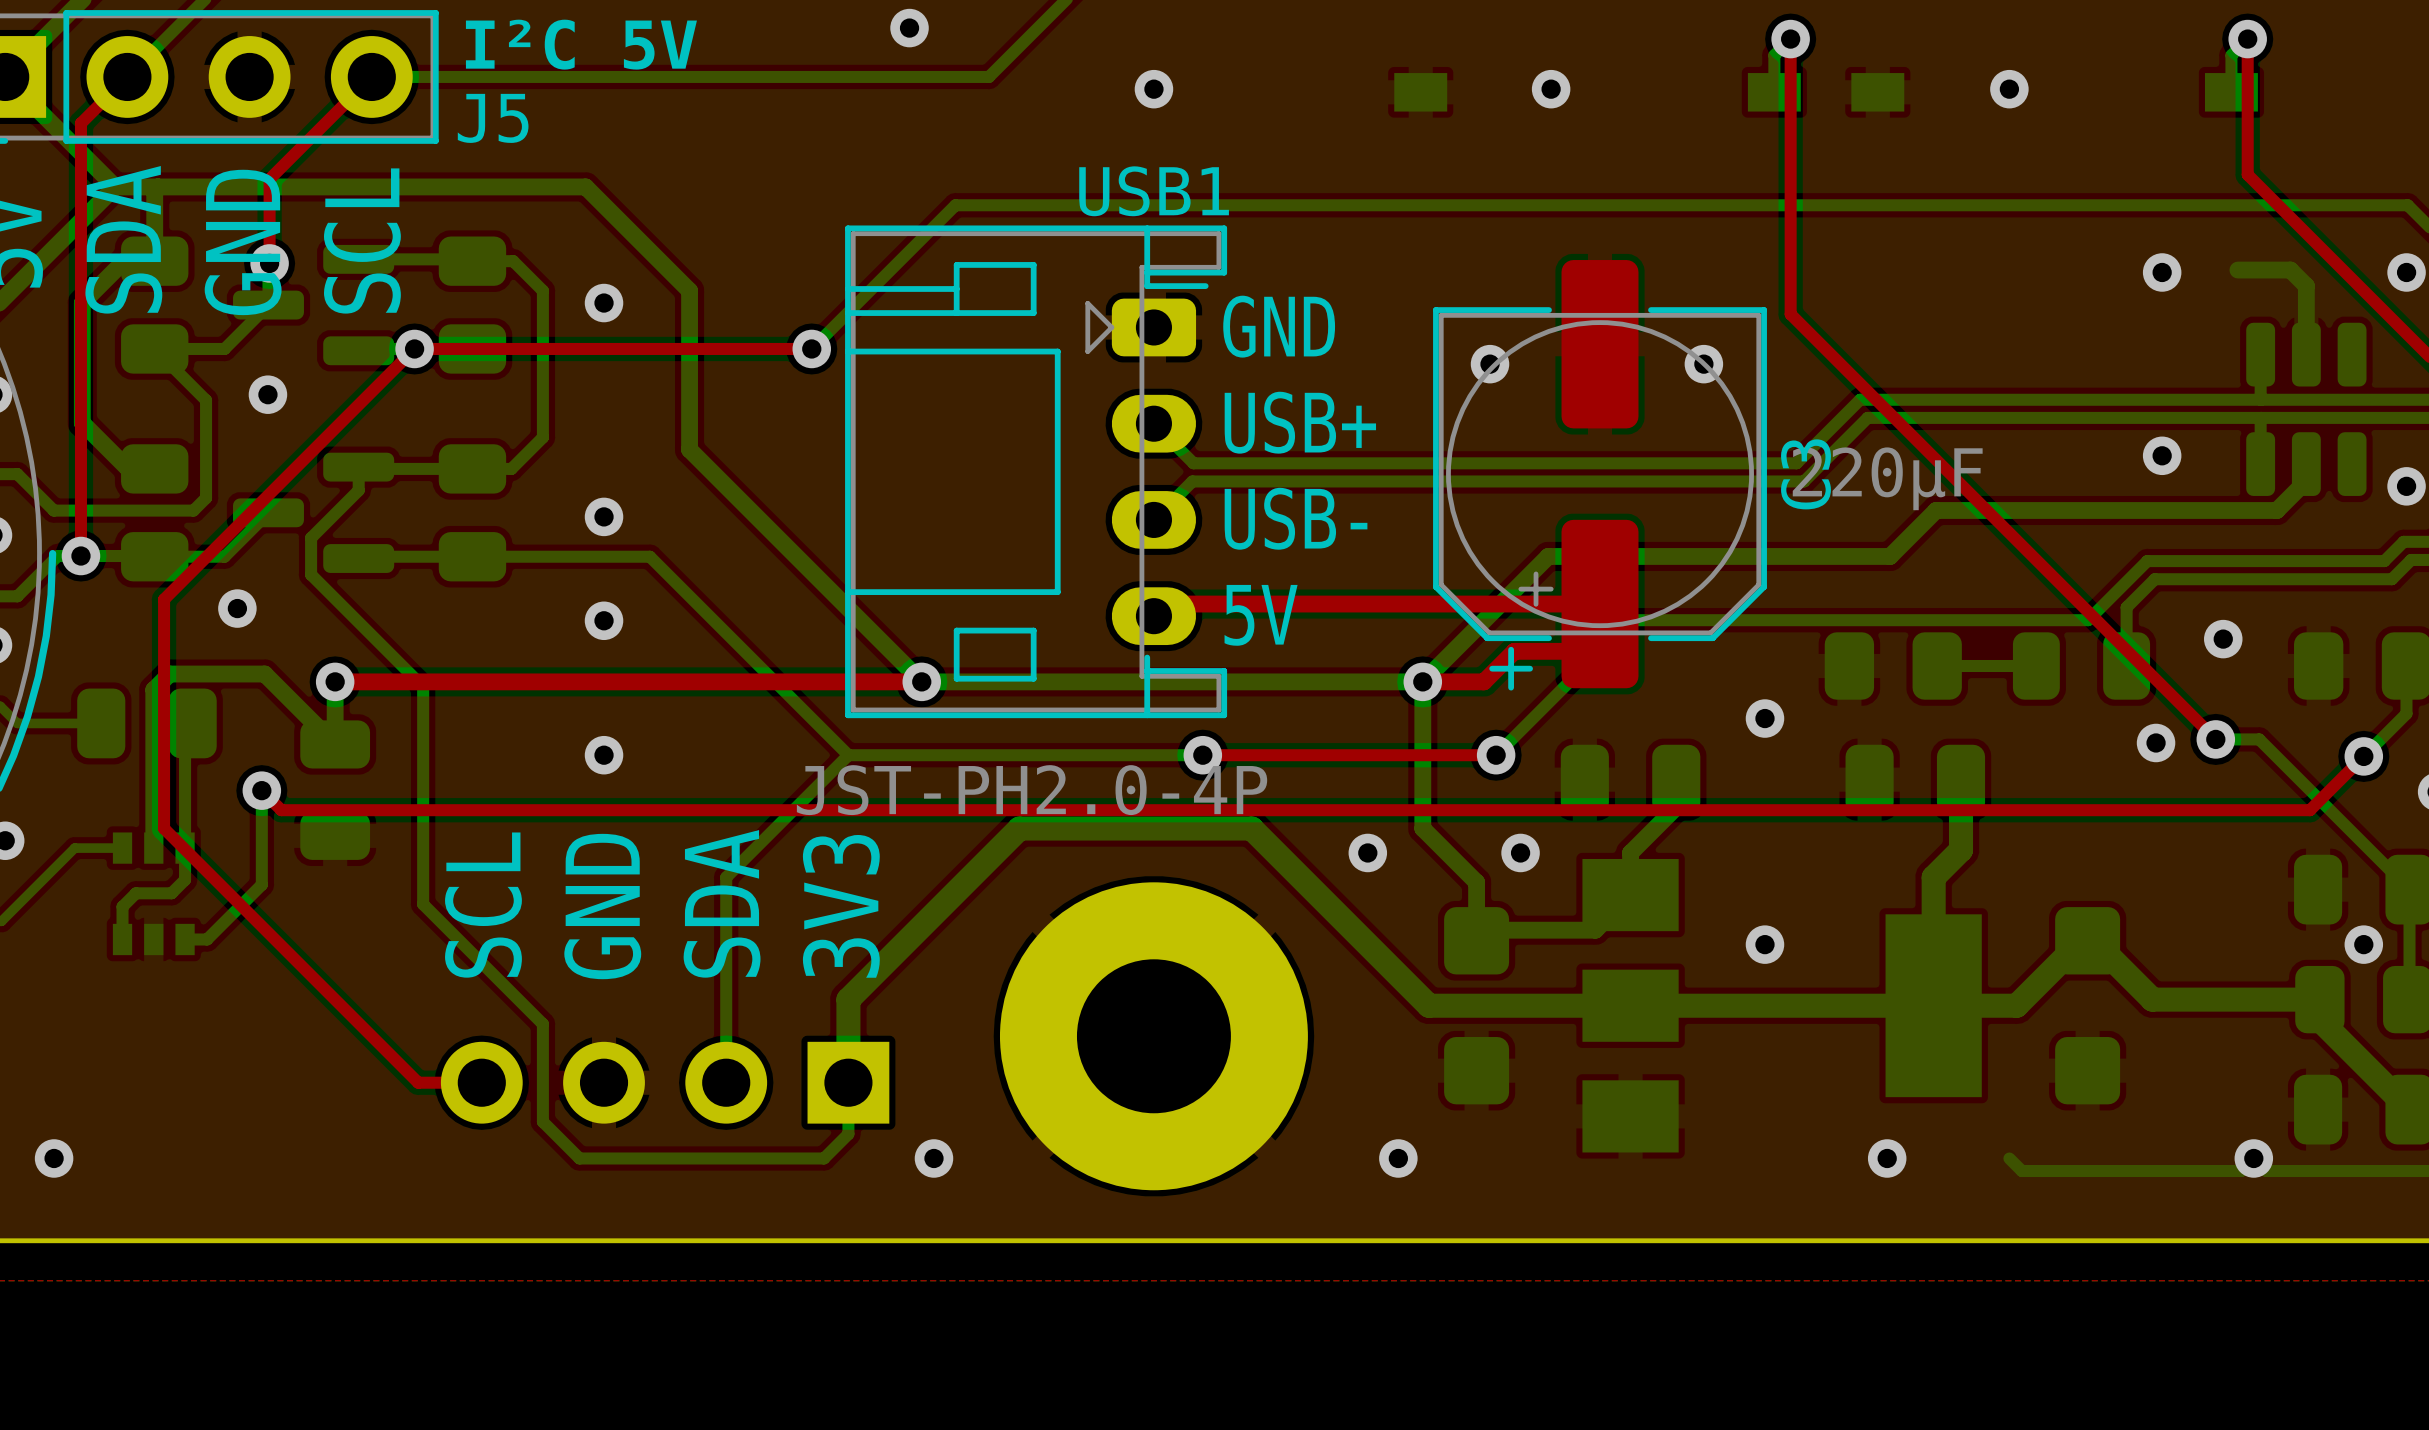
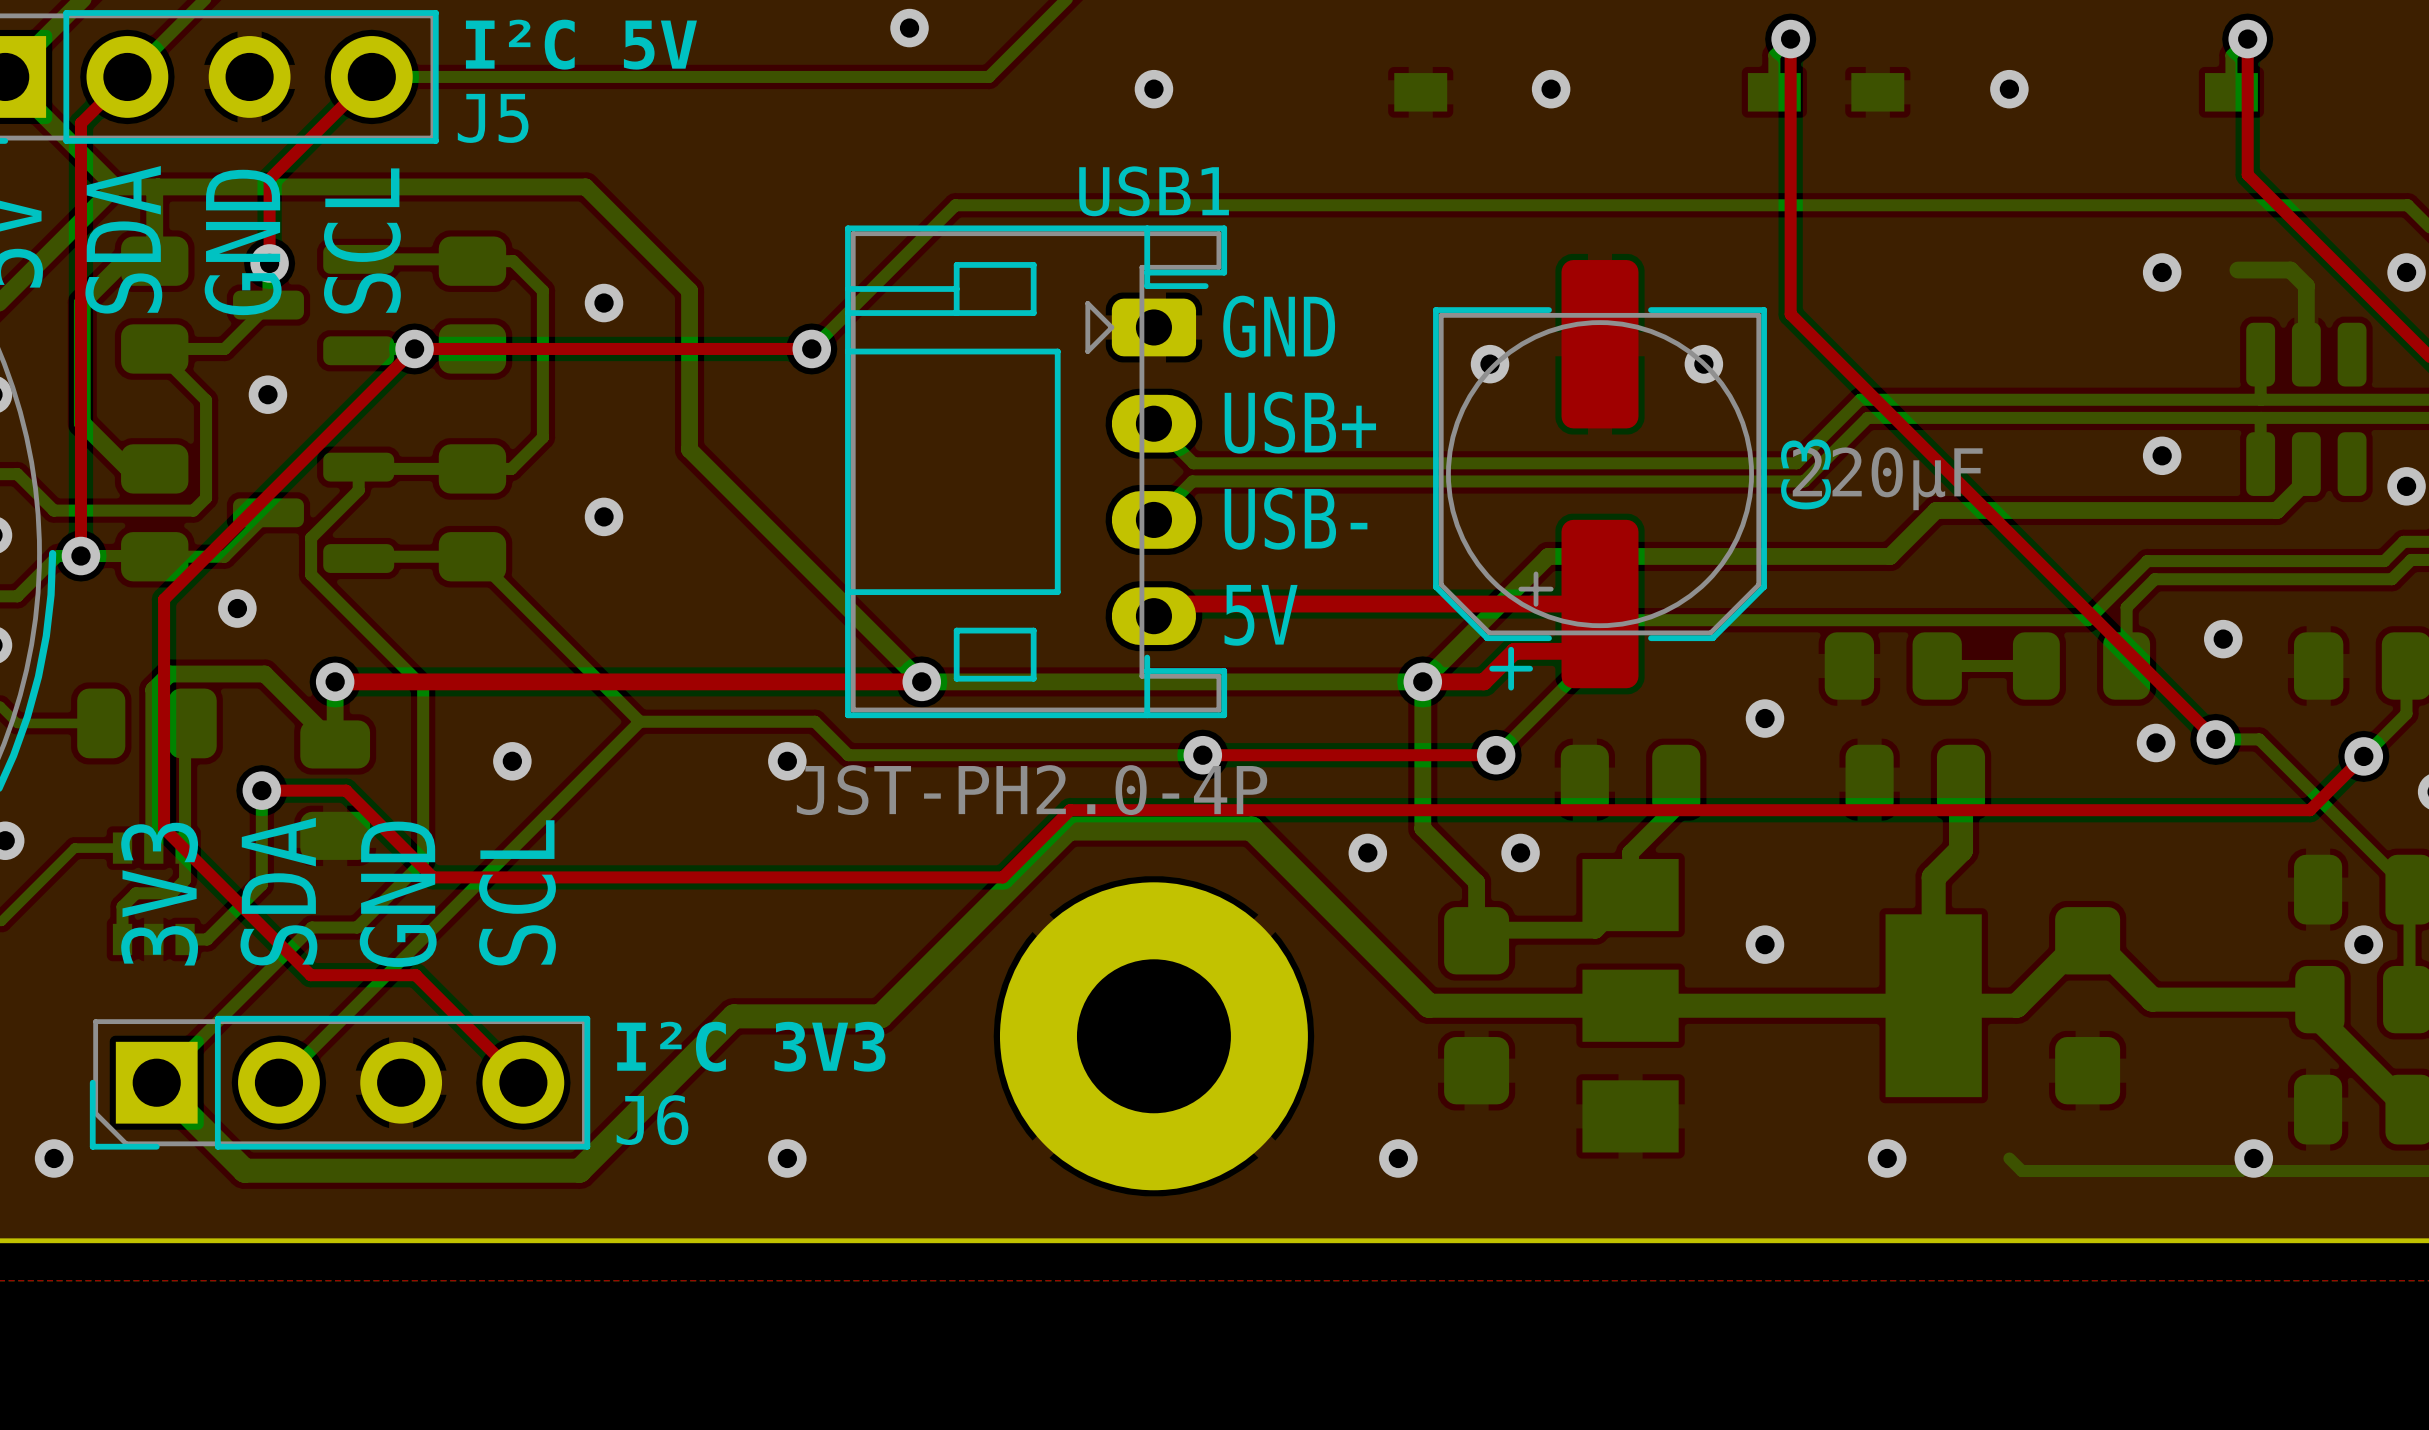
bottom track: (474, 556) (649, 556) (814, 721) -> (474, 556) (639, 721)
via: (604, 620) -> none
bottom track: none -> (639, 721) (278, 1082)
bottom track: none -> (639, 721) (814, 721)
via: (604, 755) -> none
bottom track: (848, 755) (726, 877) (726, 1082) -> none
via: none -> (512, 761)
via: none -> (787, 761)
top track: (261, 790) (281, 810) (1070, 810) -> (261, 790) (346, 790) (432, 877) (1002, 877) (1070, 810)
bottom track: (1068, 828) (1019, 828) (848, 999) (848, 1134) (823, 1158) (579, 1158) (542, 1121) (542, 1024) (423, 904) (423, 861) -> (1068, 828) (880, 1016) (733, 1016) (579, 1170) (244, 1170) (156, 1082) (311, 927) (357, 927) (423, 861)
text position: SDA (722, 903) -> SDA (278, 891)
text position: SCL (483, 905) -> SCL (517, 892)
text position: GND (602, 906) -> GND (398, 894)
text position: 3V3 (841, 906) -> 3V3 (159, 894)
top track: (310, 975) (418, 1082) (481, 1082) -> (310, 975) (415, 975) (523, 1082)
J6 side: bottom (665, 1082) -> top (340, 1082)
via position: (933, 1158) -> (787, 1158)

